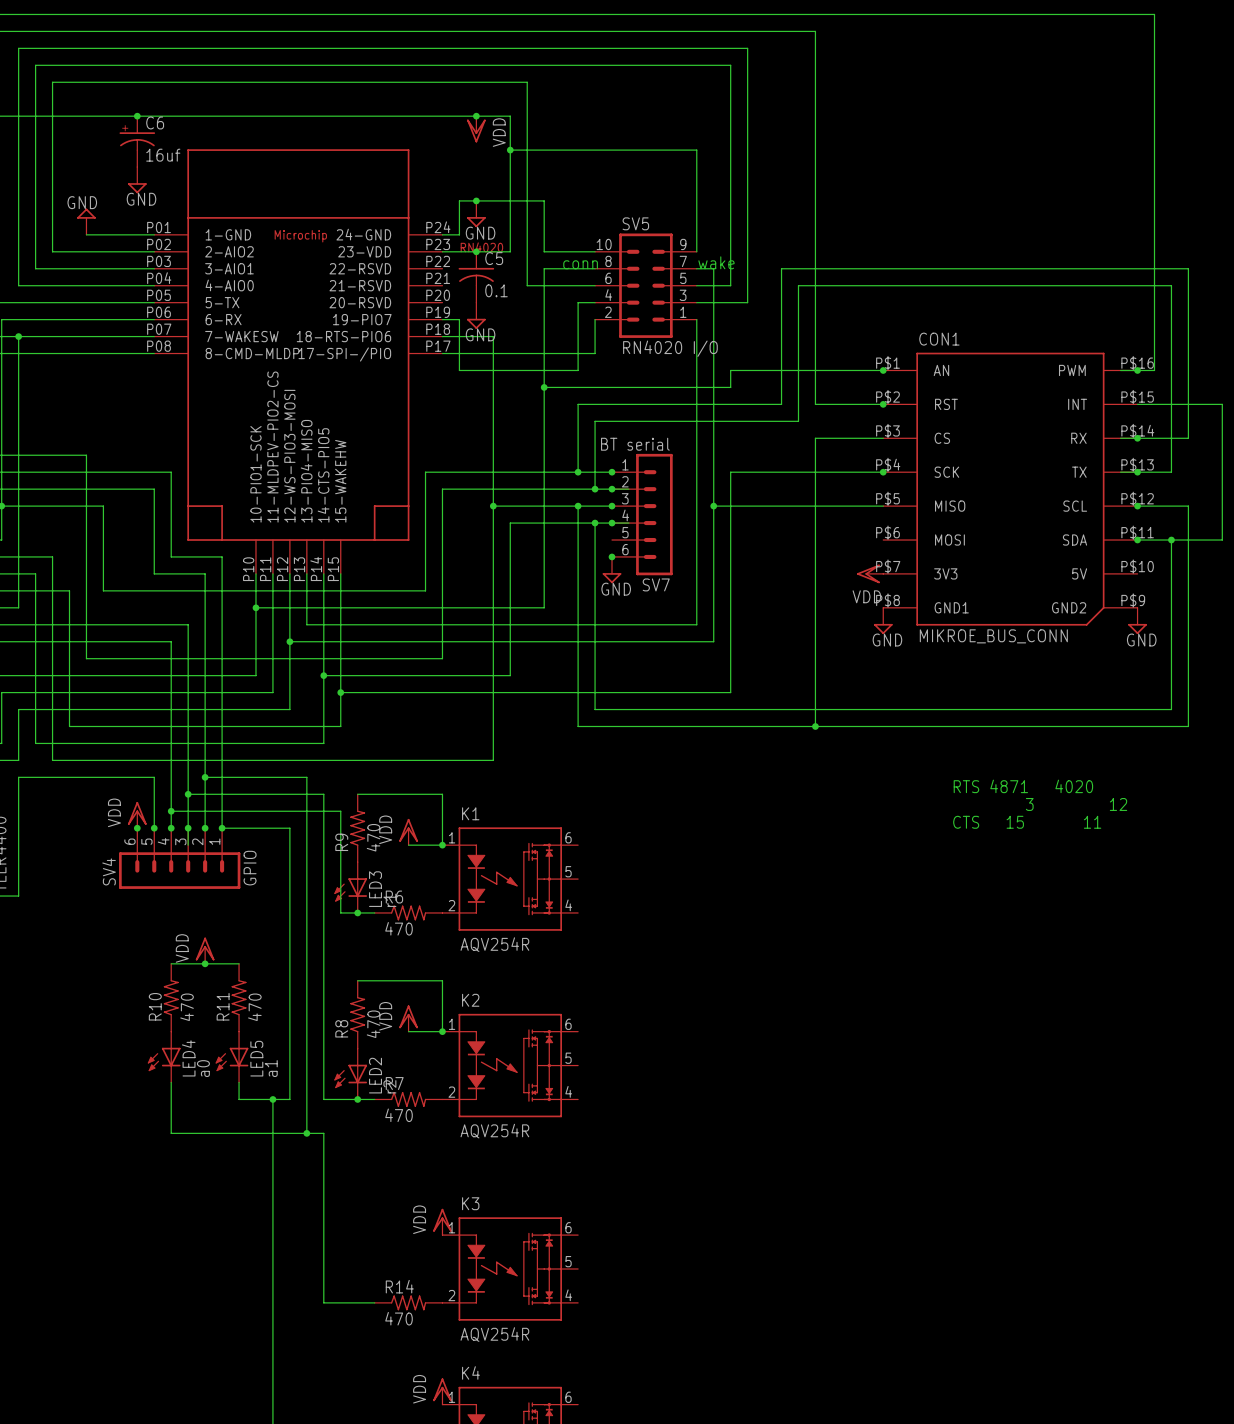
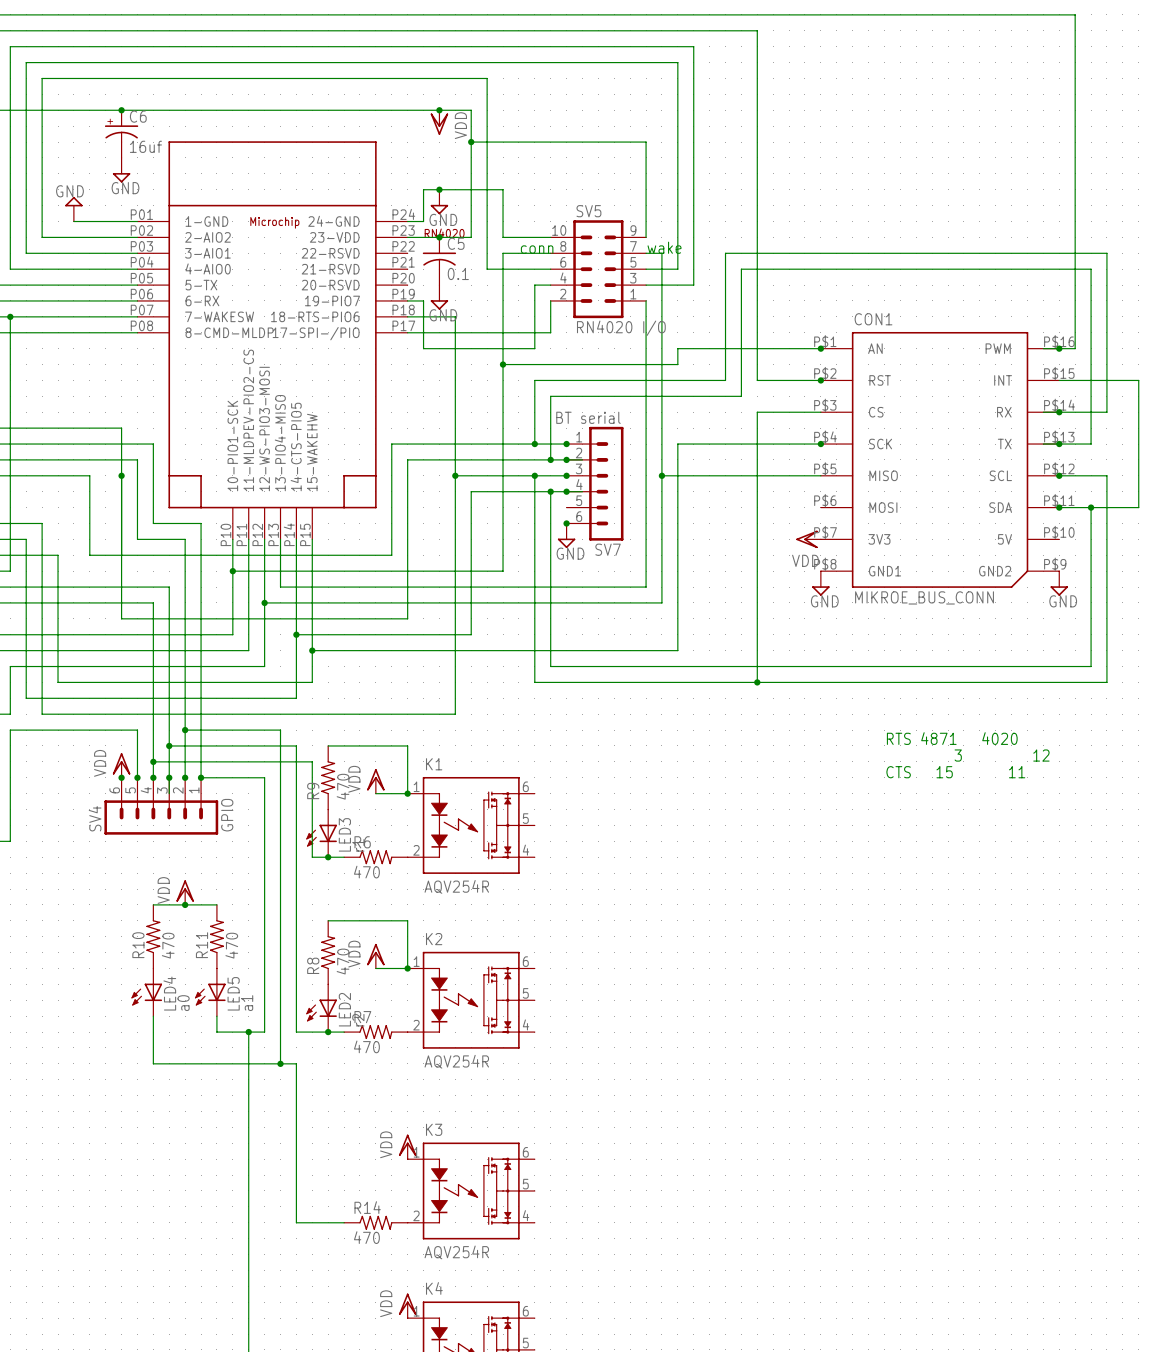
wire: (86, 455) (86, 658) (137, 658) -> (73, 428) (121, 428) (121, 618)
junction: none -> (121, 475)

